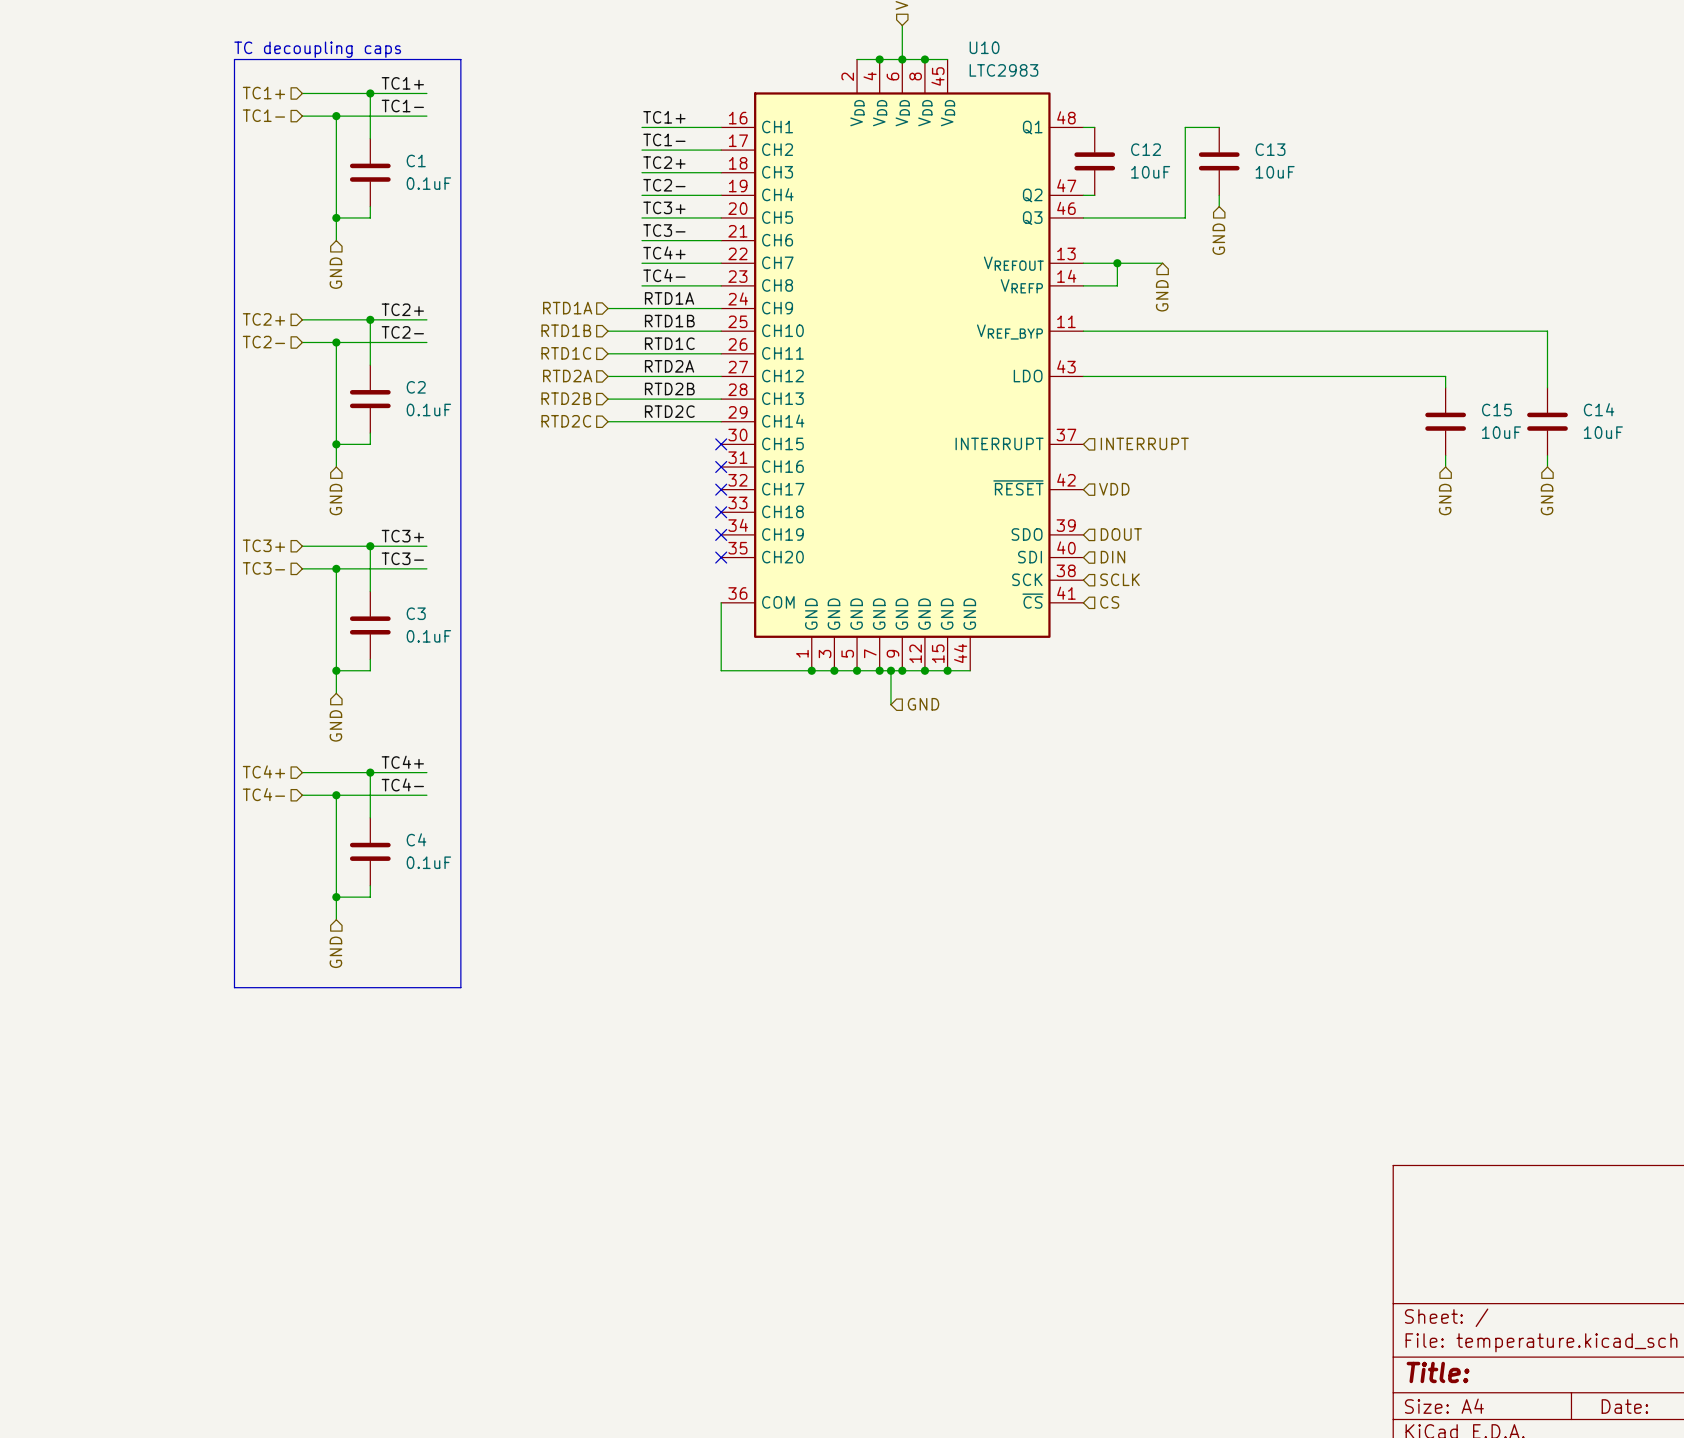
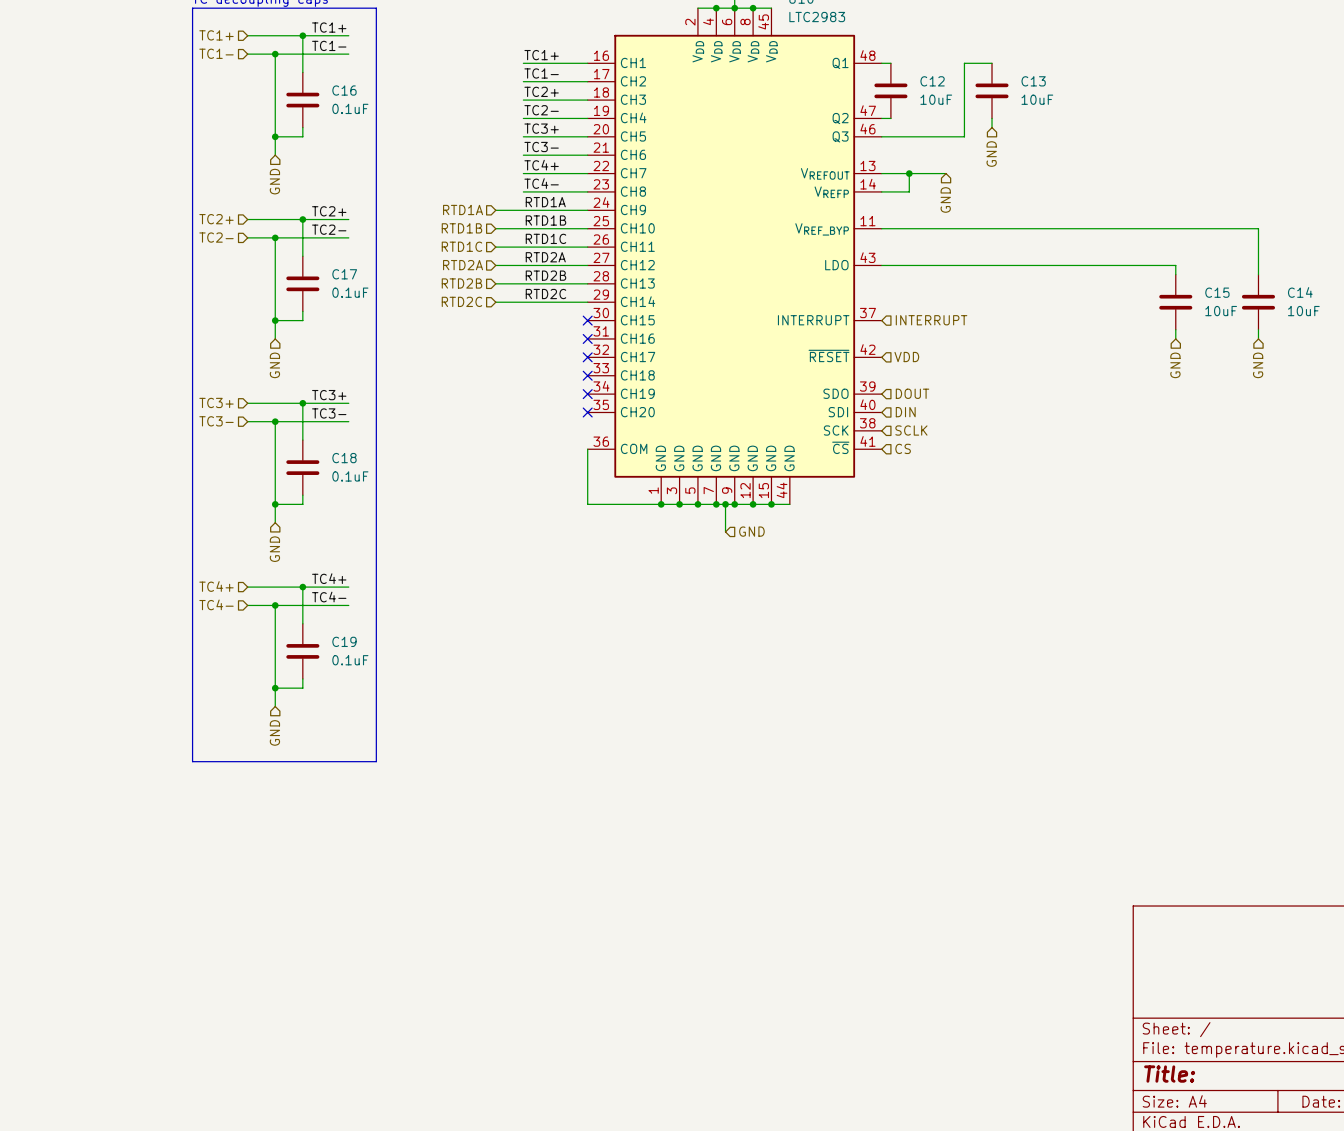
C1 name: C1 (416, 160) -> C16 (344, 90)
C2 name: C2 (416, 387) -> C17 (344, 274)
C3 name: C3 (416, 613) -> C18 (344, 458)
C4 name: C4 (416, 839) -> C19 (344, 641)

